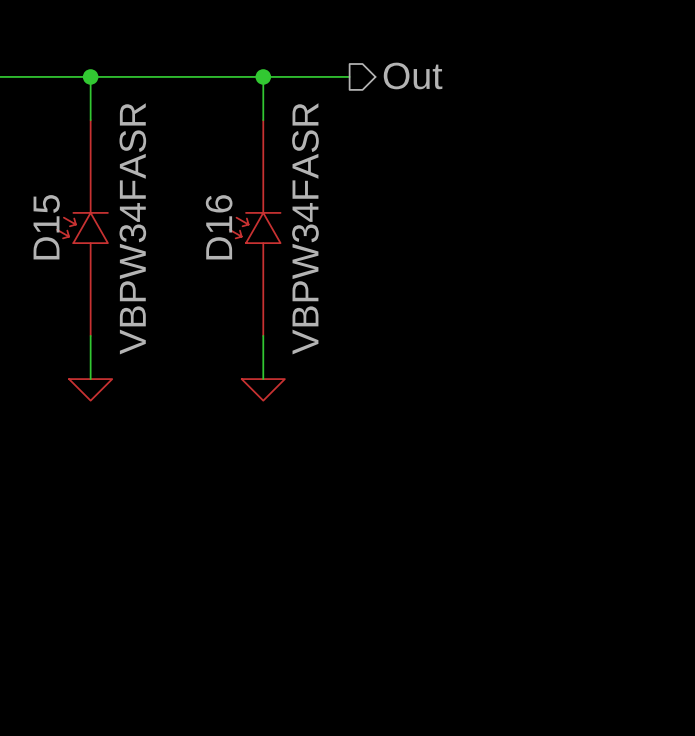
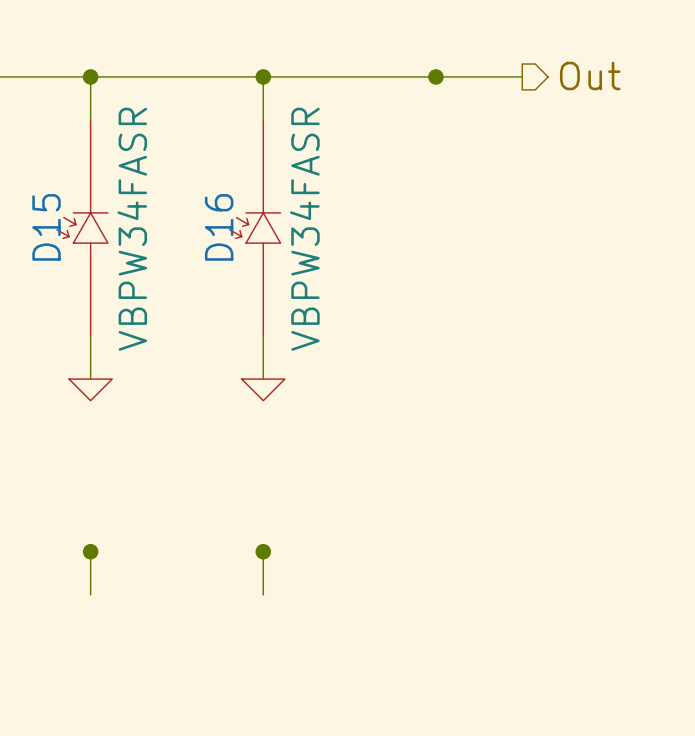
hierarchical label position: Out (413, 75) -> Out (590, 75)
wire: none -> (349, 76) (522, 76)
junction: none -> (435, 76)
wire: none -> (90, 551) (90, 594)
junction: none -> (90, 551)
wire: none -> (263, 551) (263, 594)
junction: none -> (263, 551)

